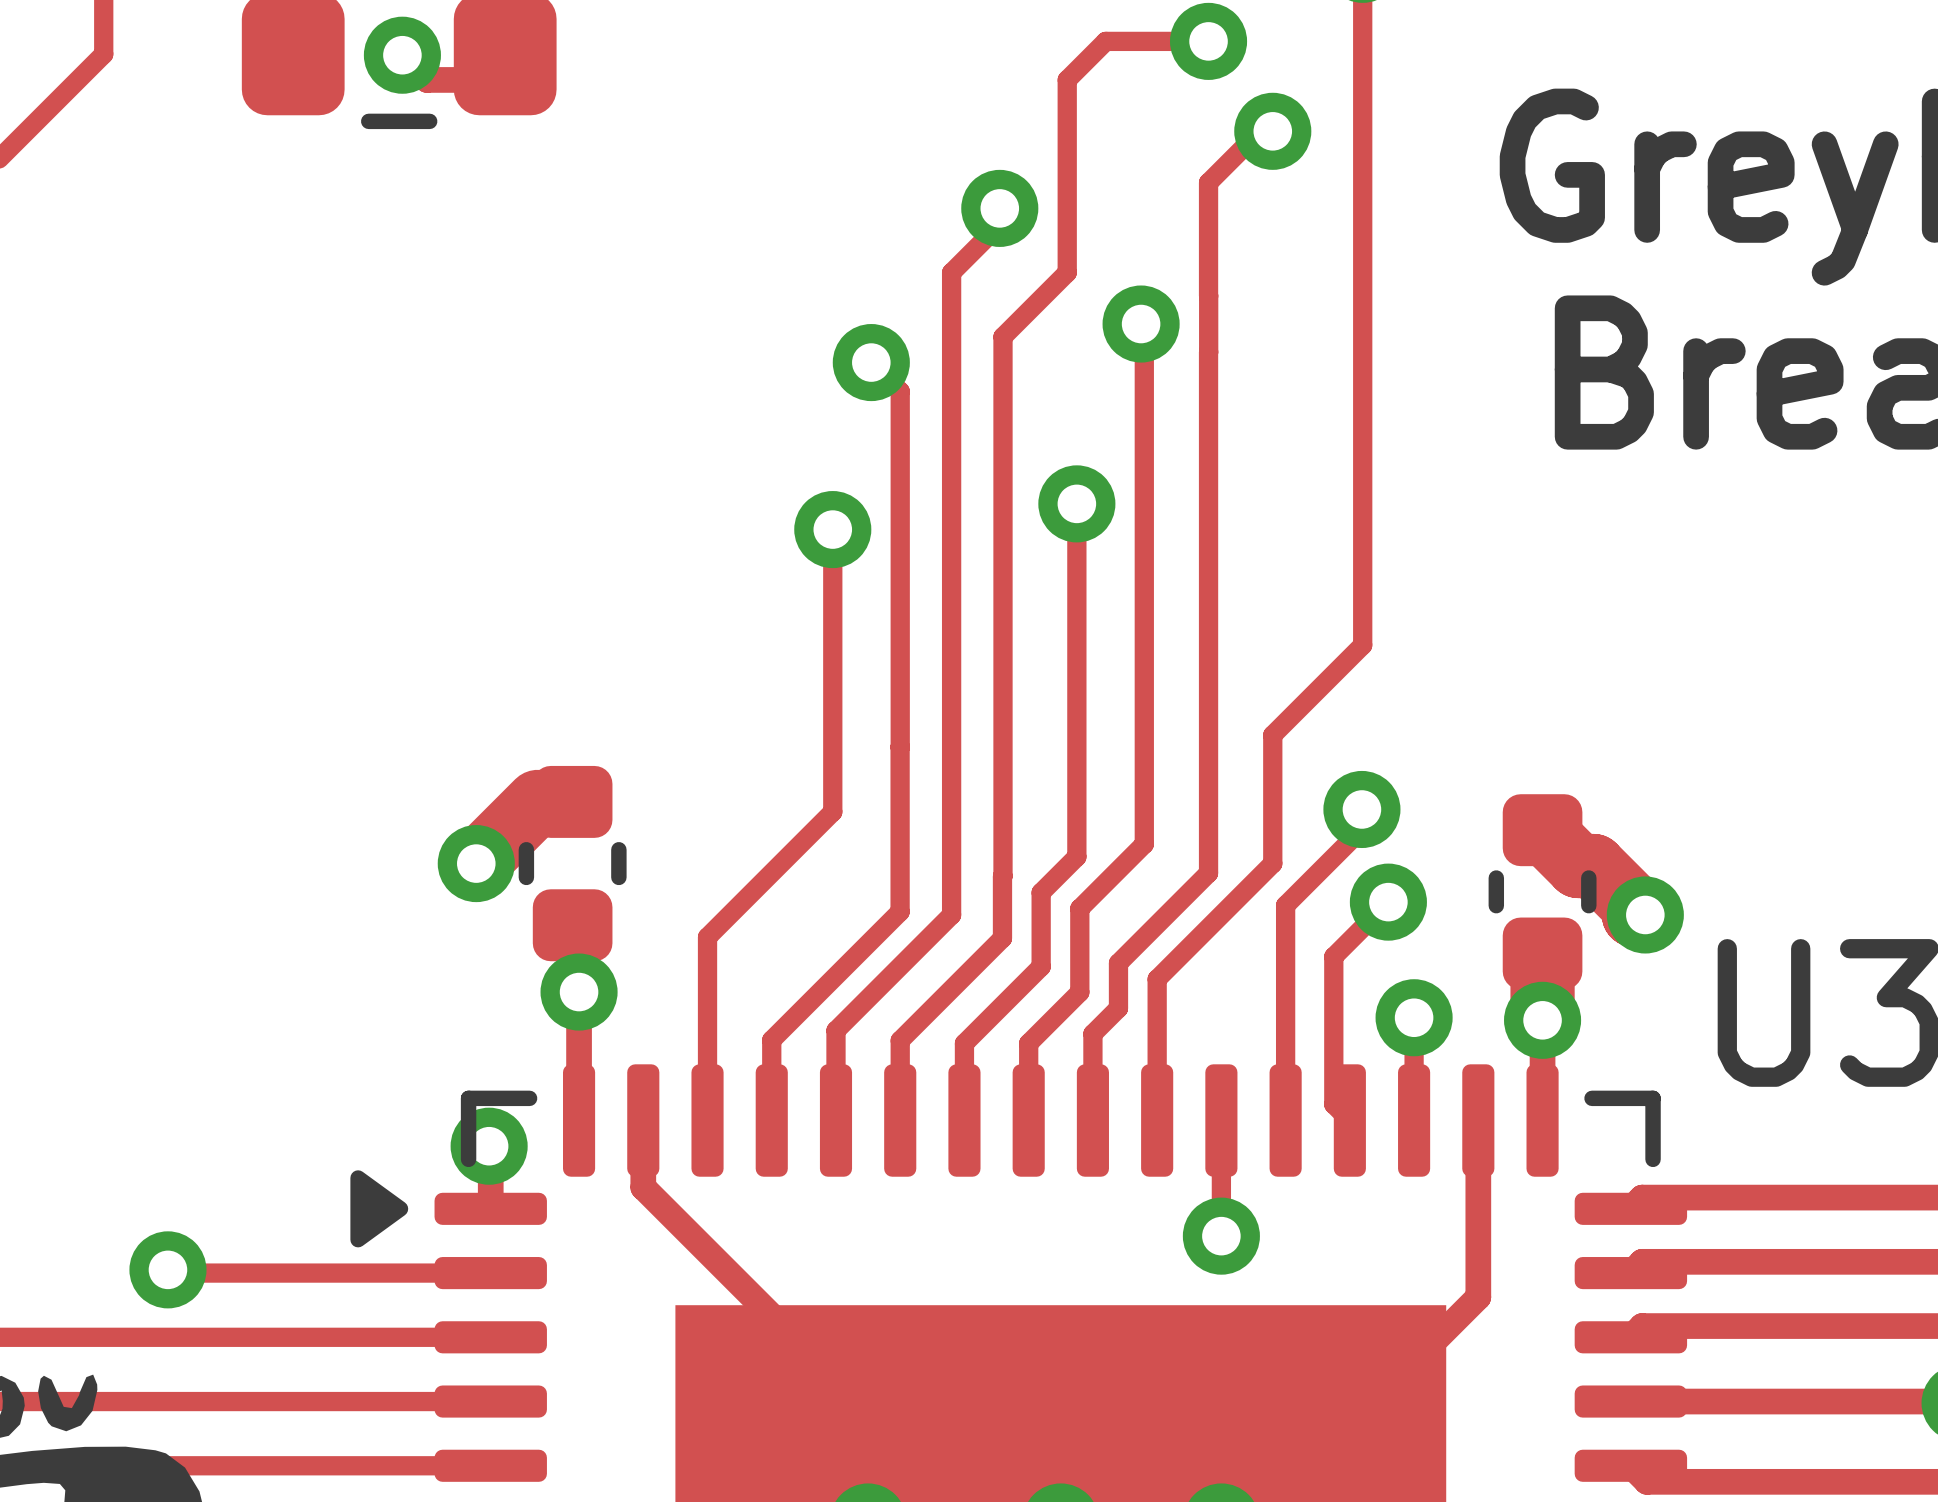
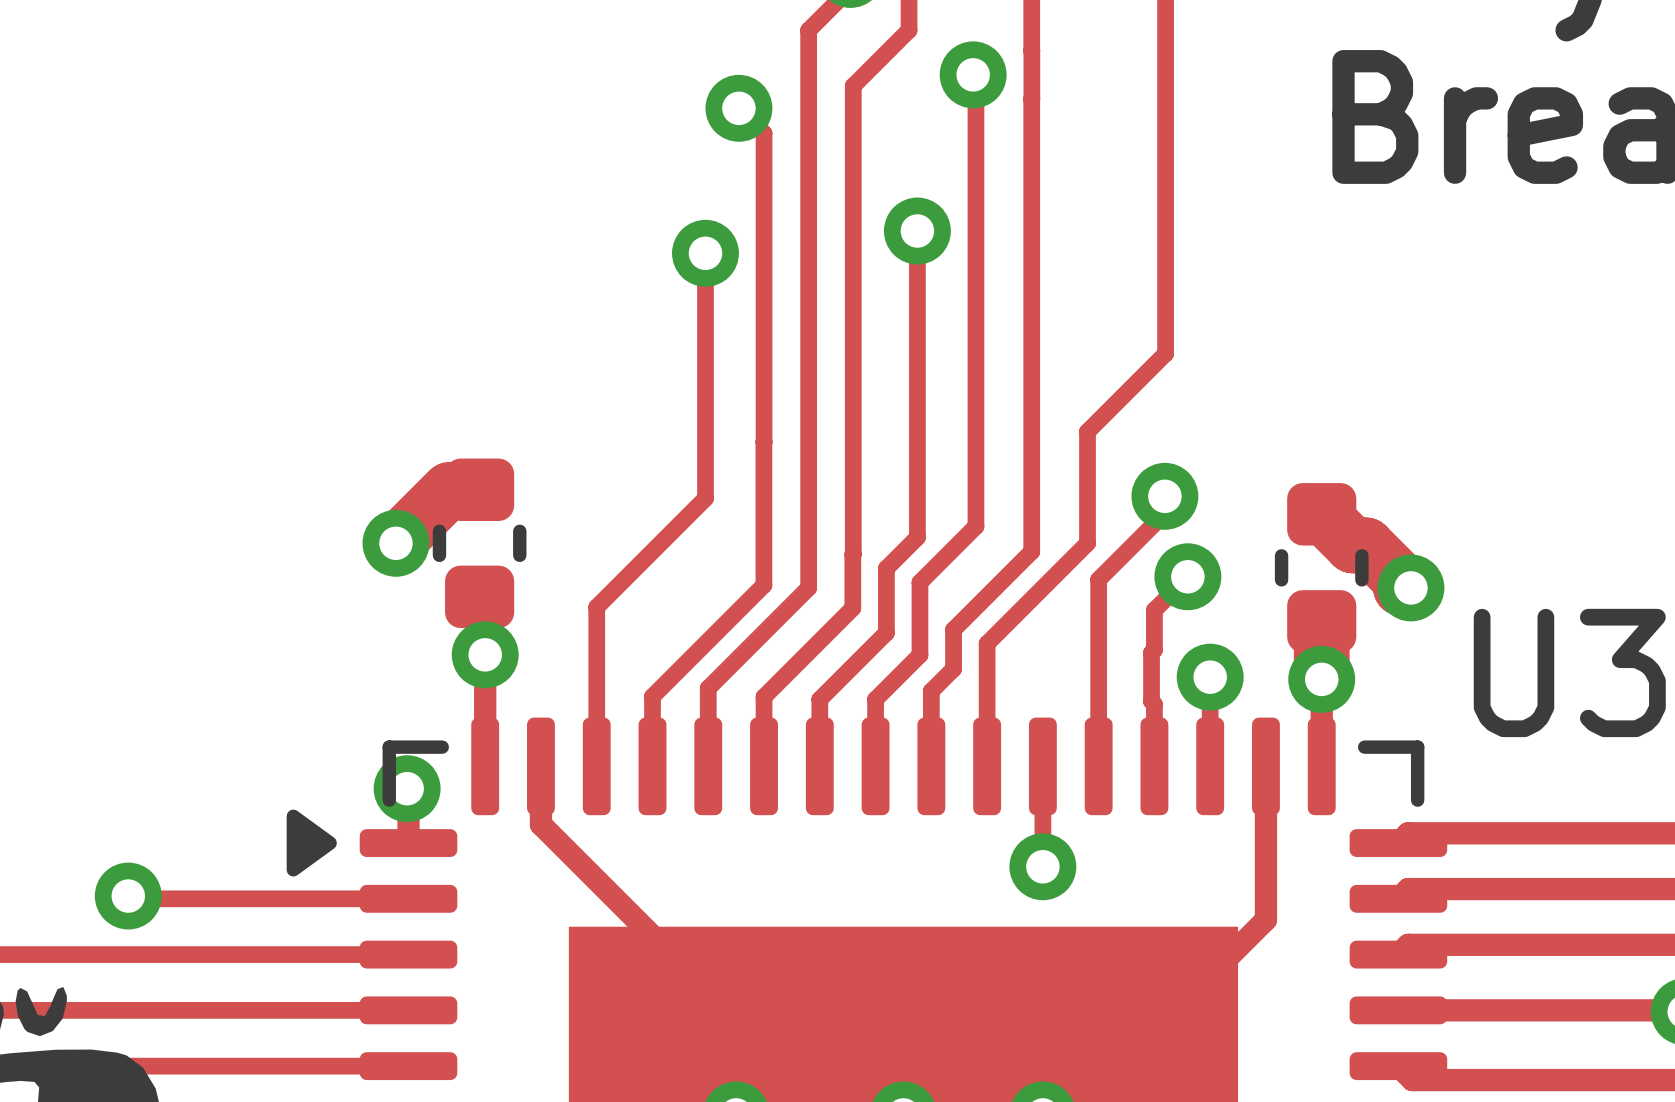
track: (1349, 940) (1333, 956) (1333, 1104) (1349, 1120) -> (1154, 610) (1154, 649) (1151, 652) (1151, 701) (1154, 704) (1154, 766)

